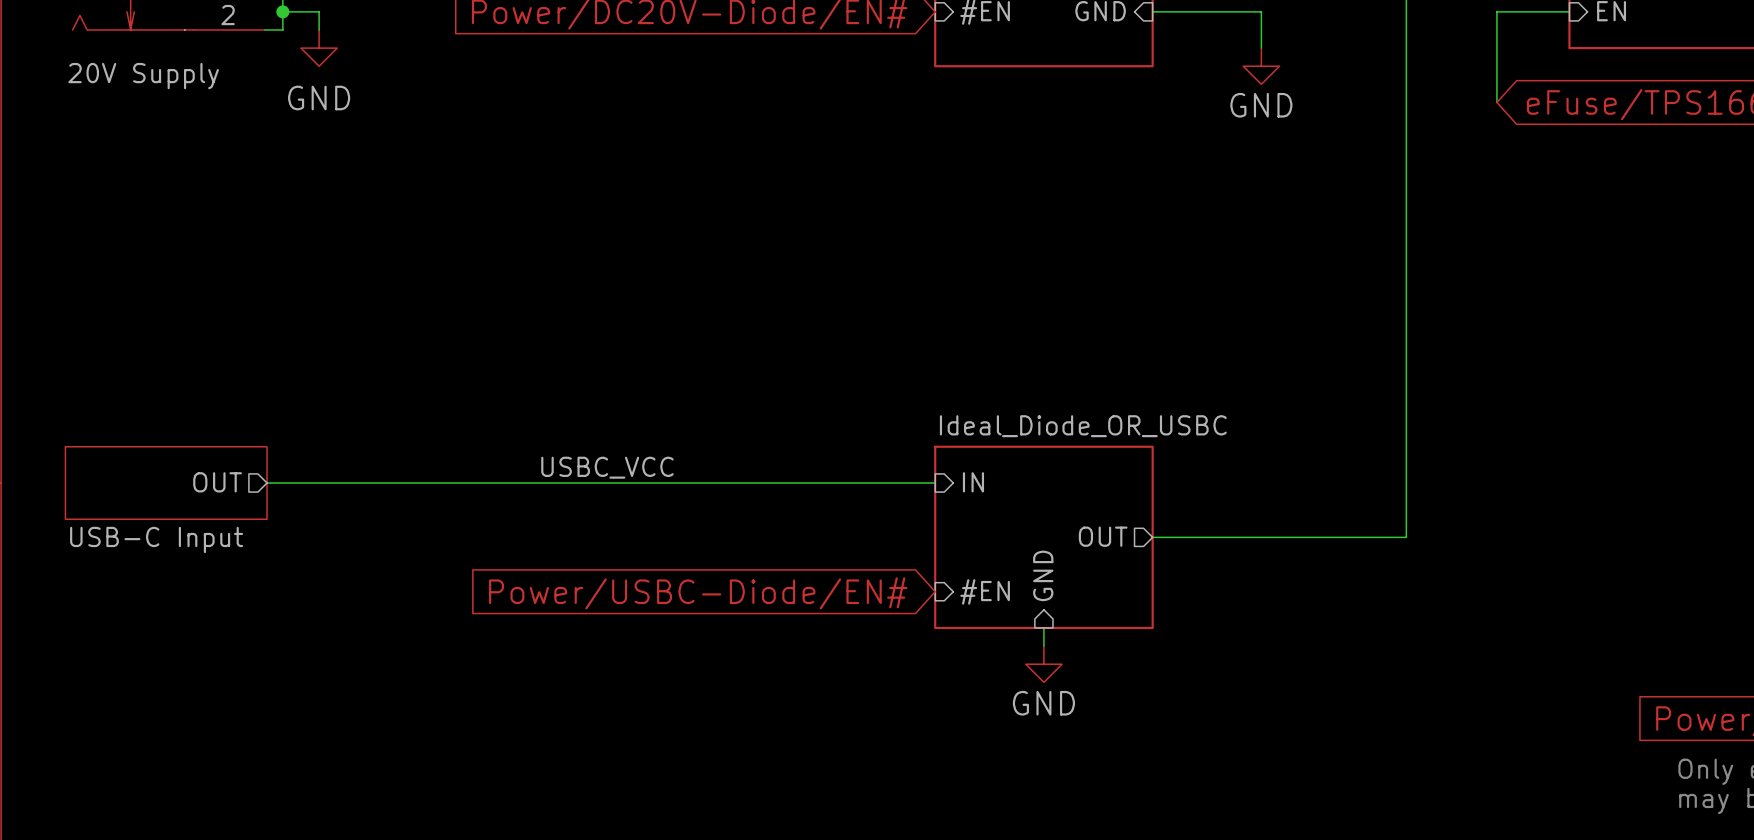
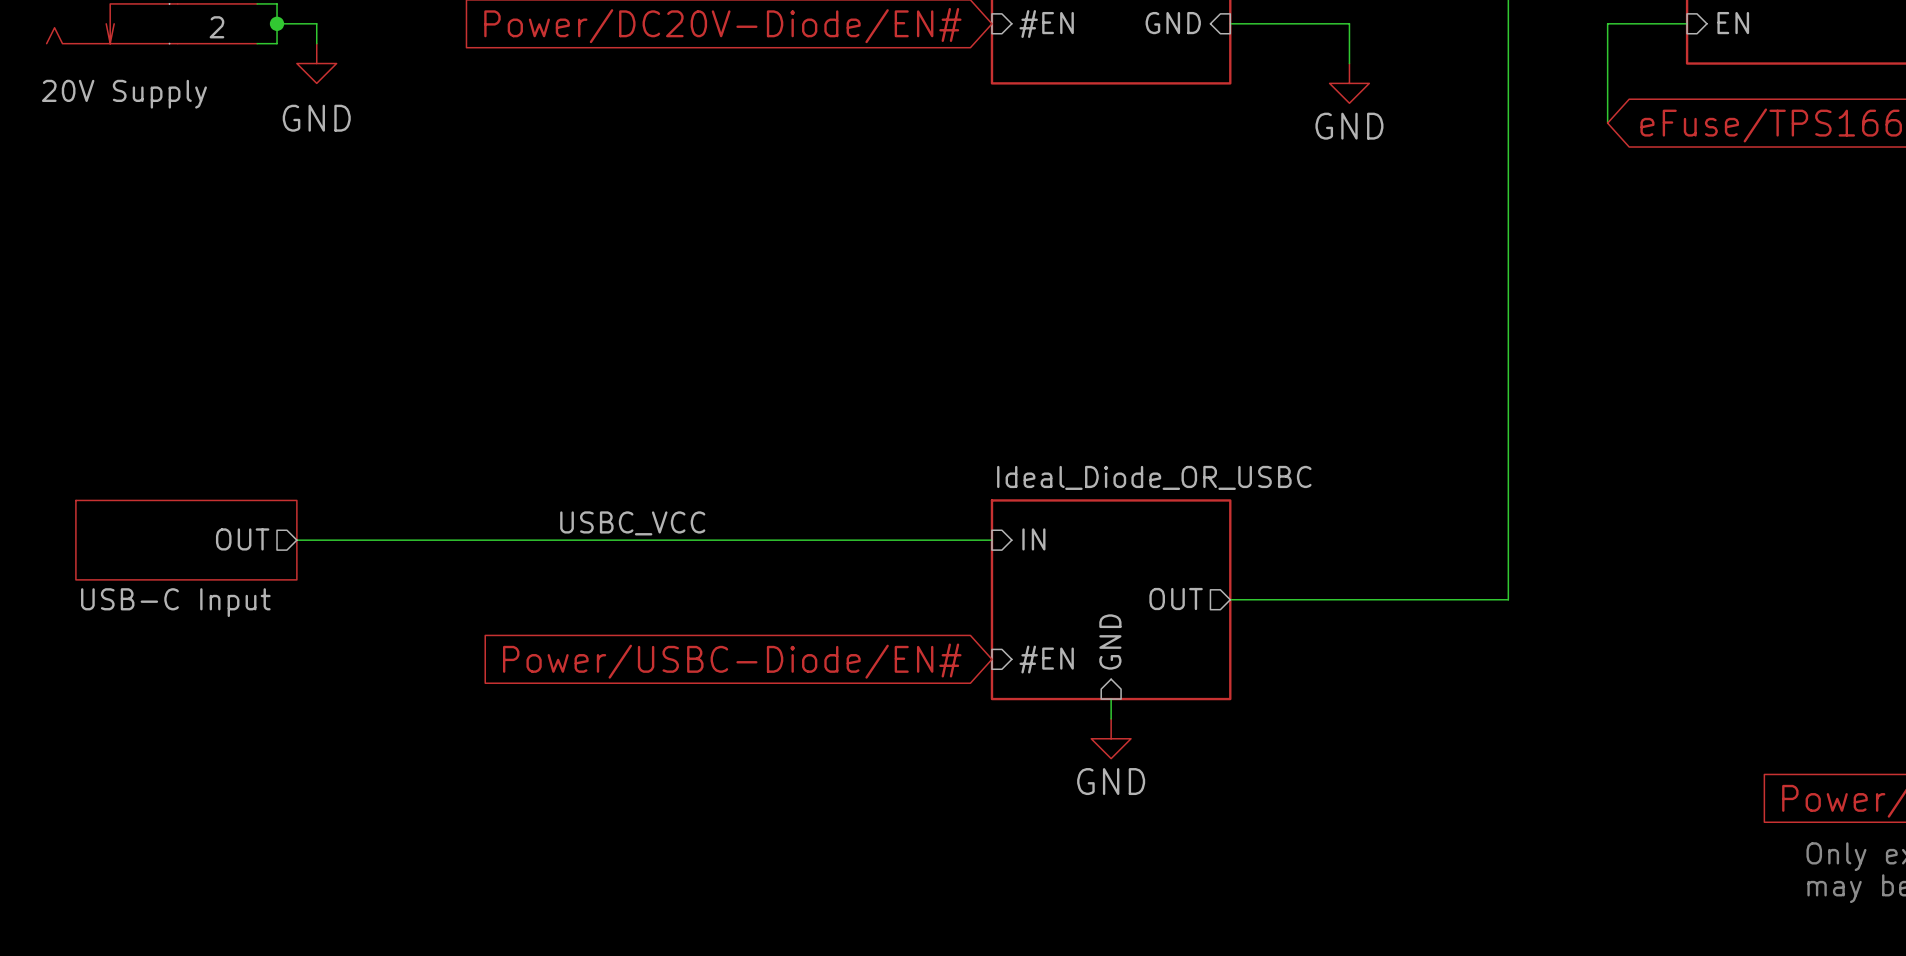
sheet pin position: OUT (217, 482) -> OUT (242, 539)
sheet USB-C Input position: (166, 483) -> (186, 540)
wire: (267, 483) (300, 483) -> none

